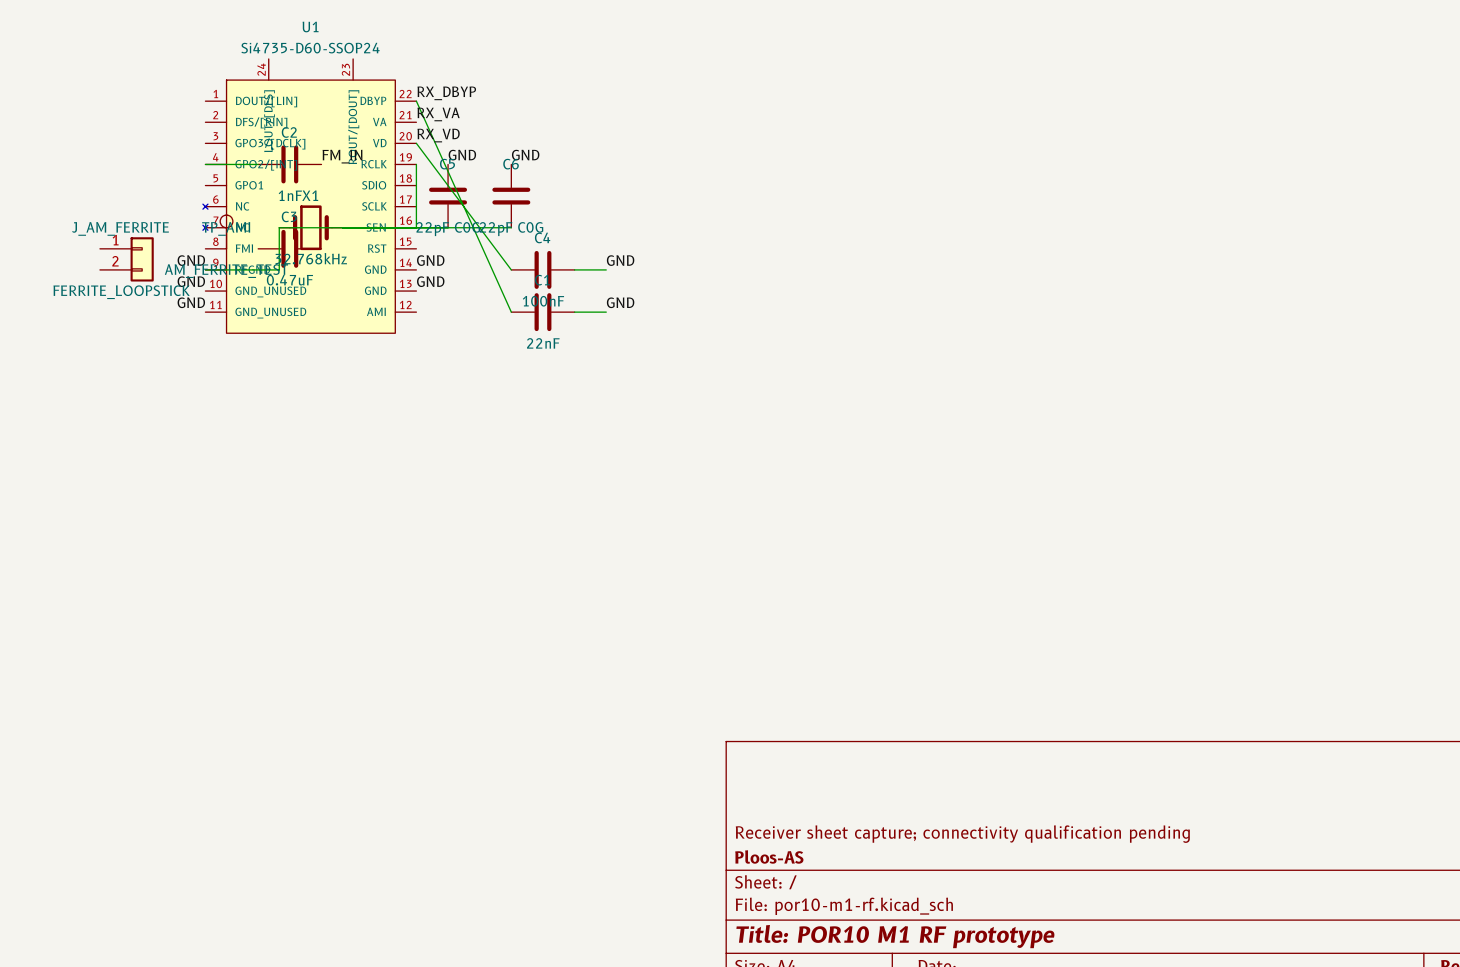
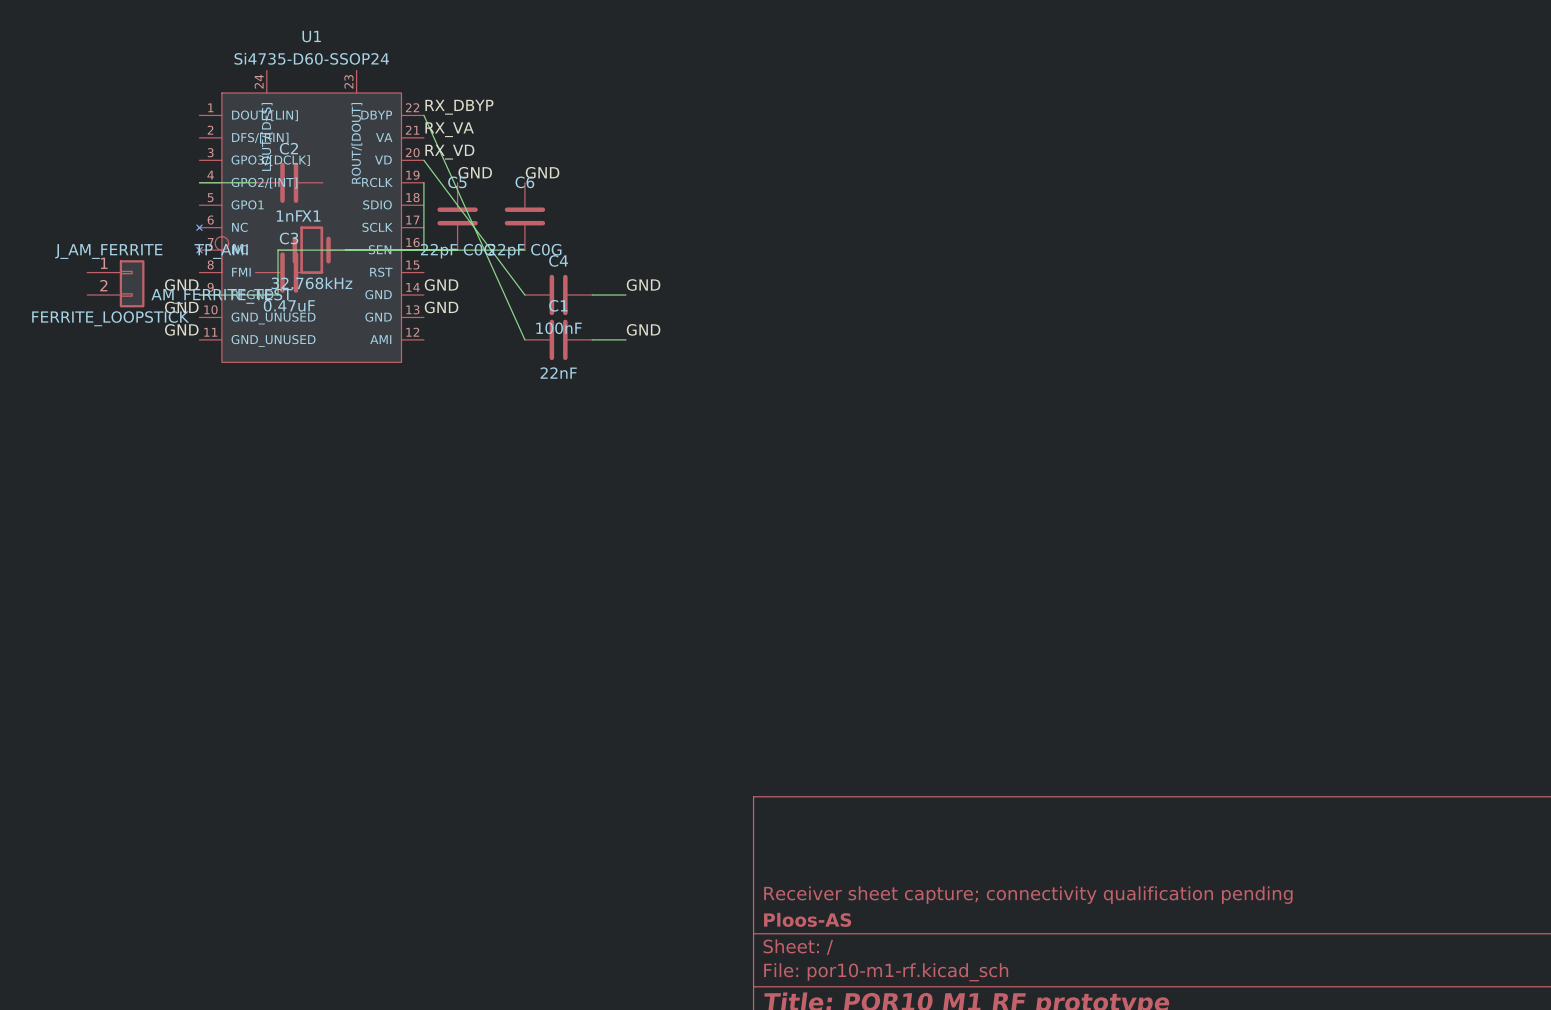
label: FM_IN (342, 156) -> none

